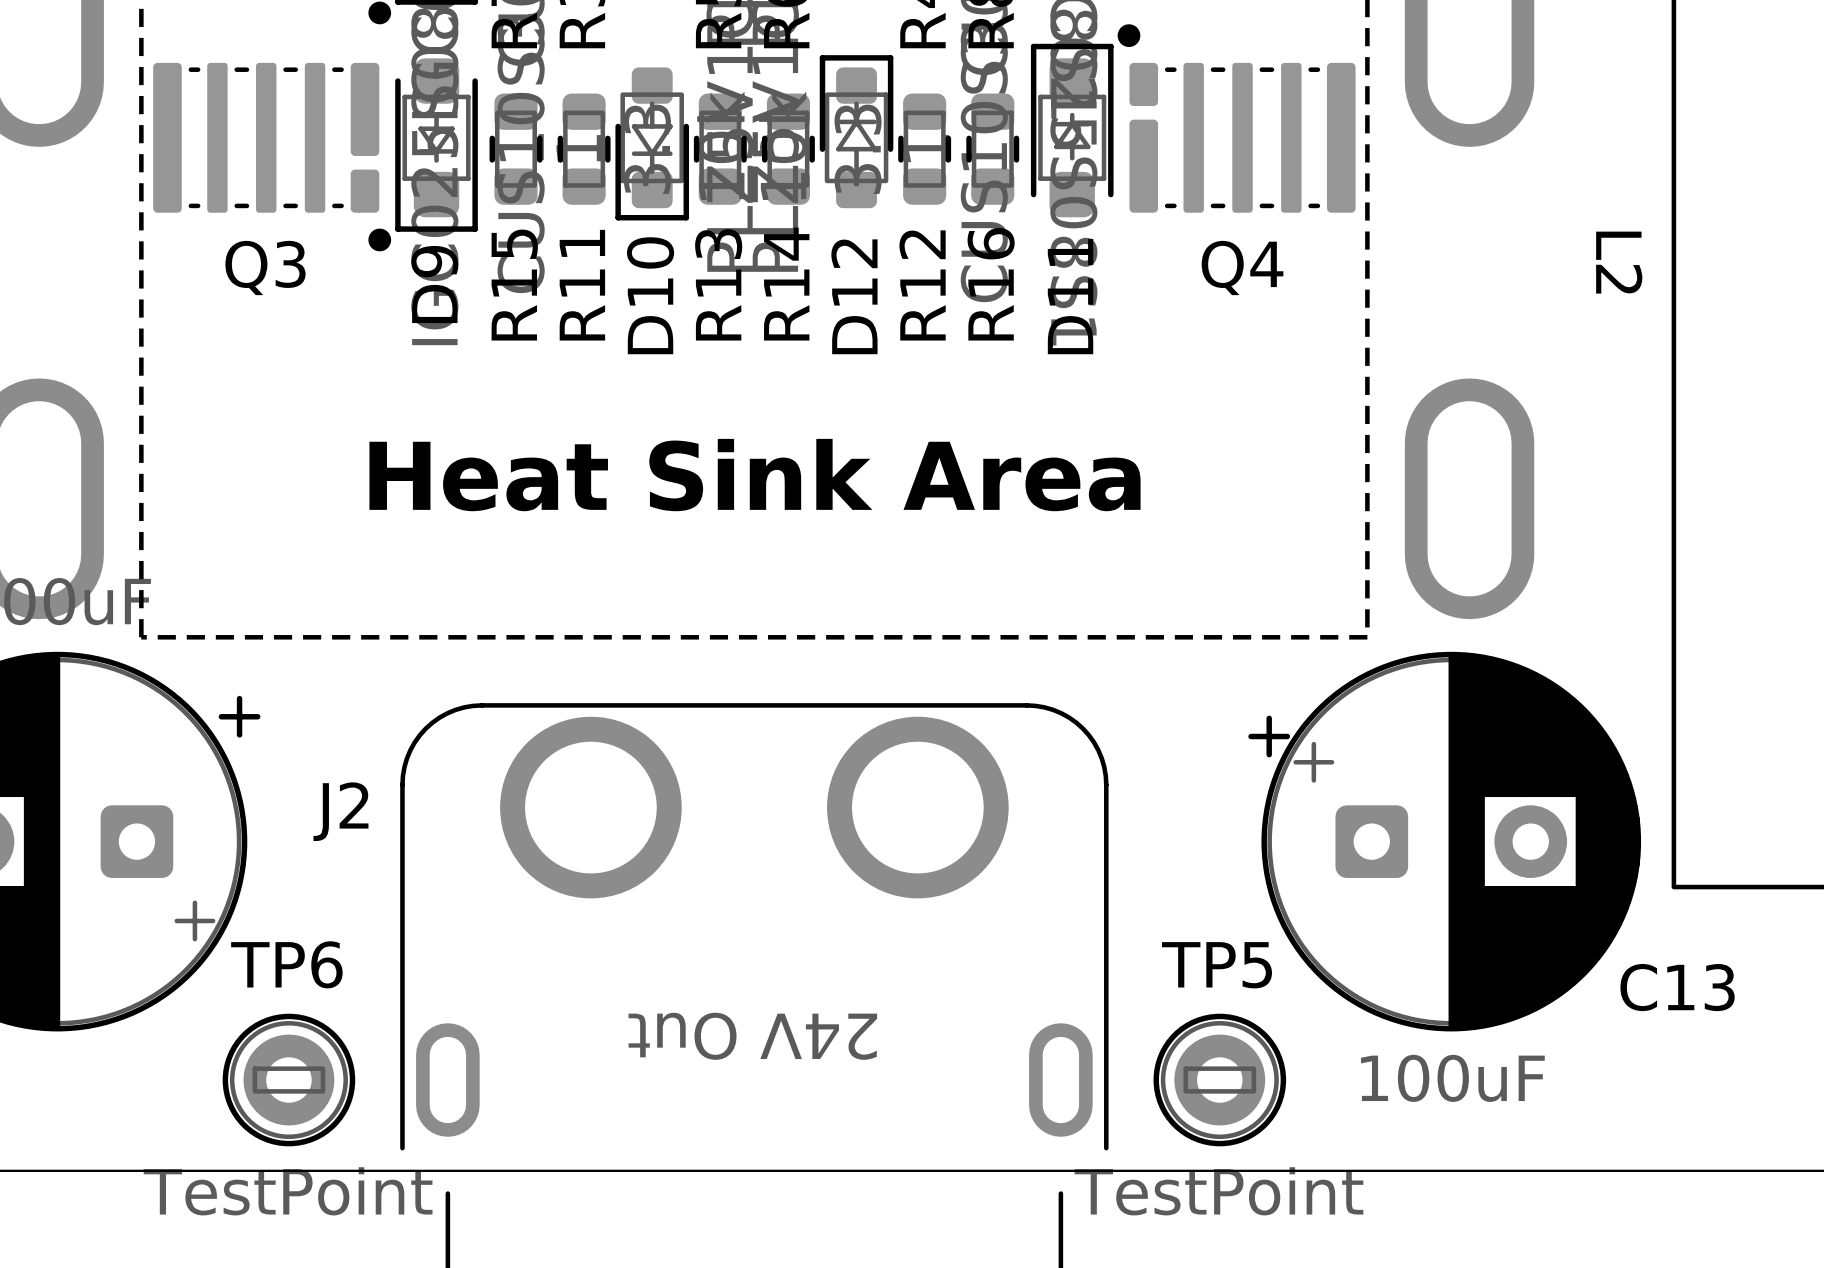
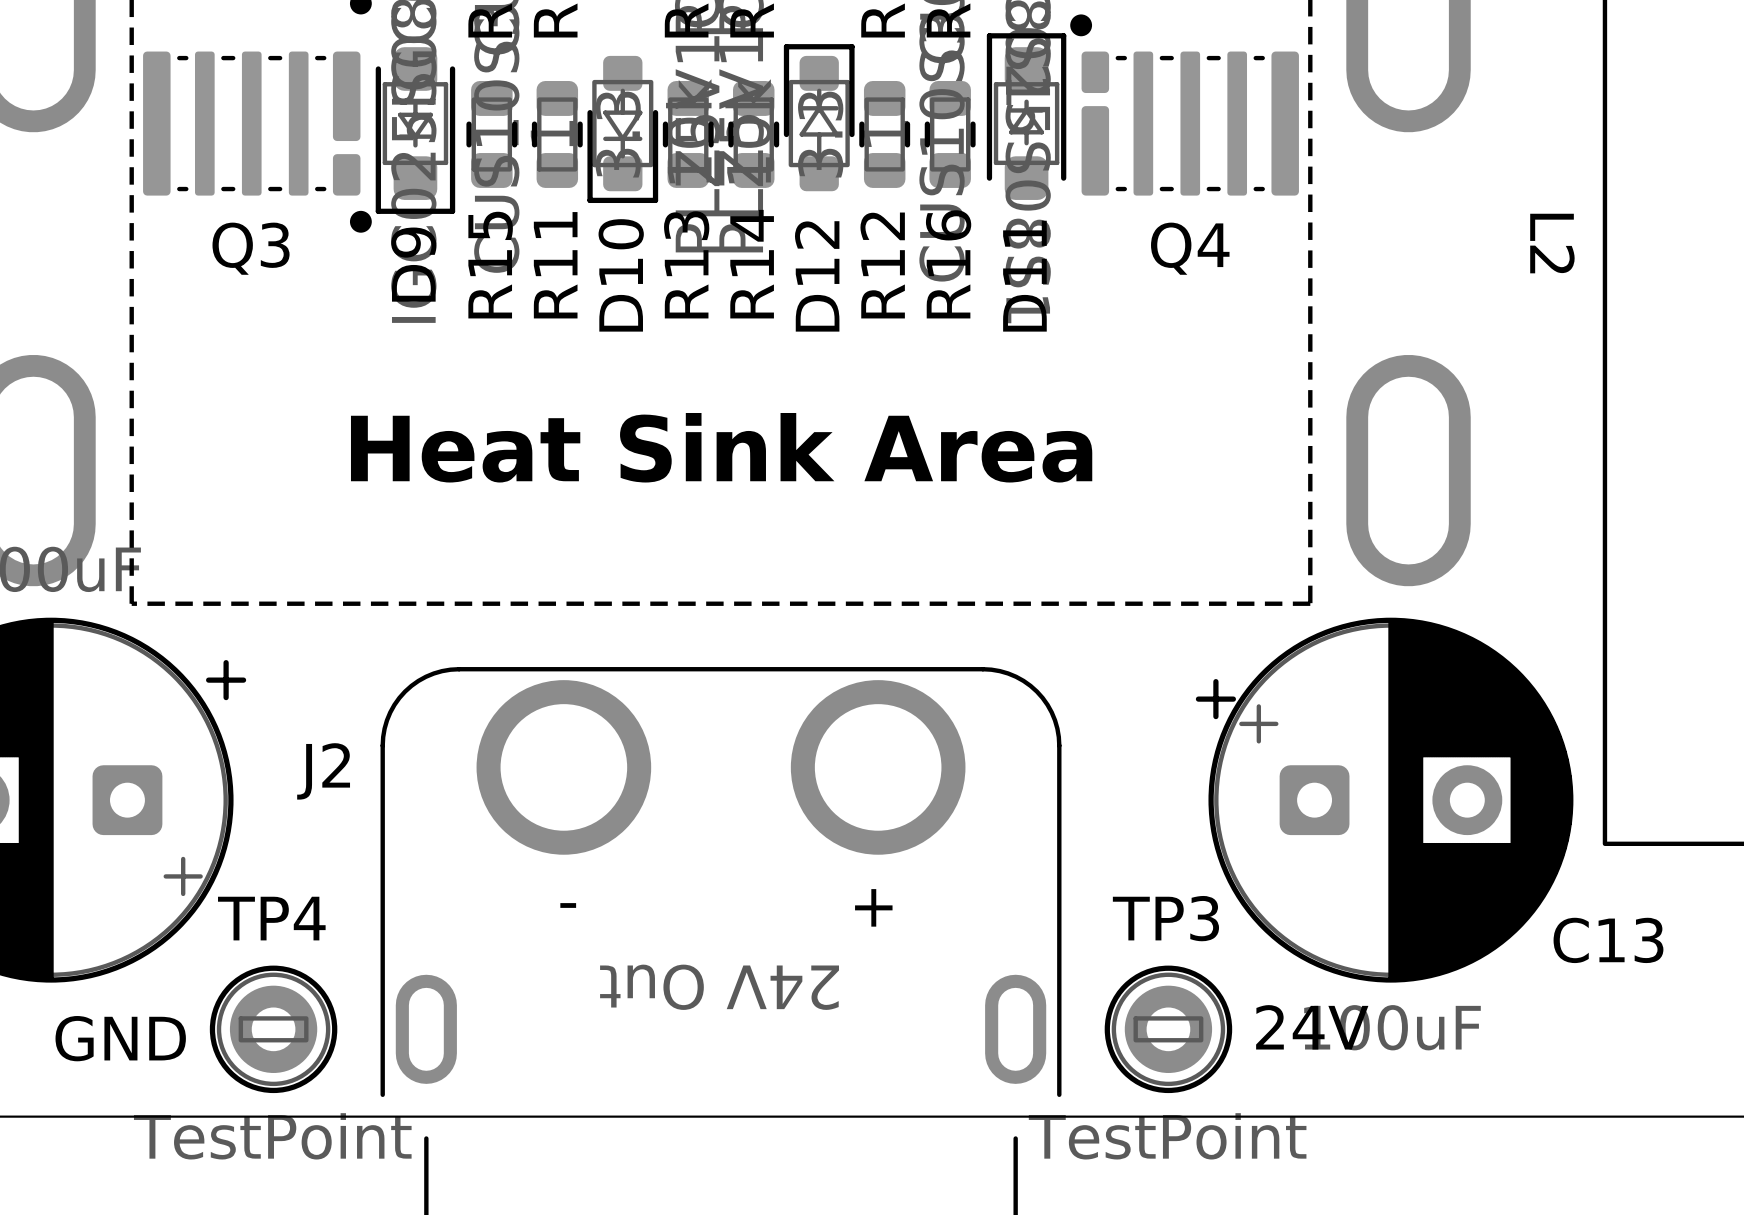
text: none -> - (568, 905)
text: none -> + (873, 907)
TP6 name: TP6 (286, 964) -> TP4 (271, 918)
TP5 name: TP5 (1217, 965) -> TP3 (1165, 918)
text: none -> 24V (1312, 1027)
text: none -> GND (120, 1038)

